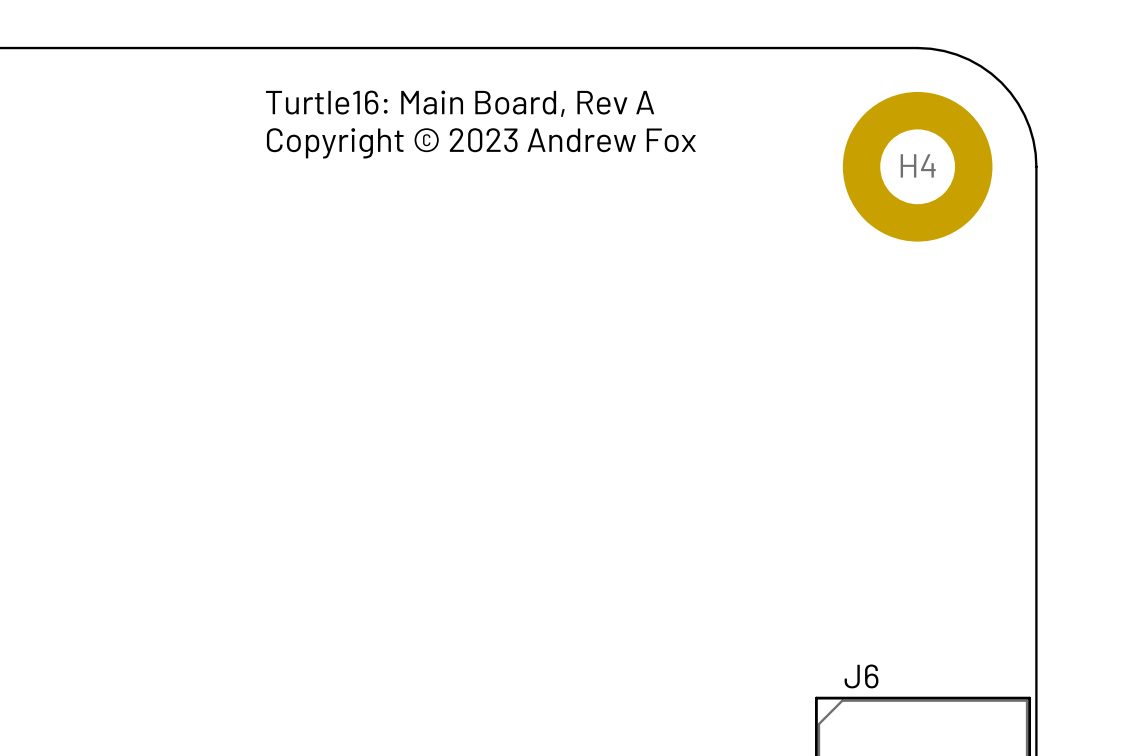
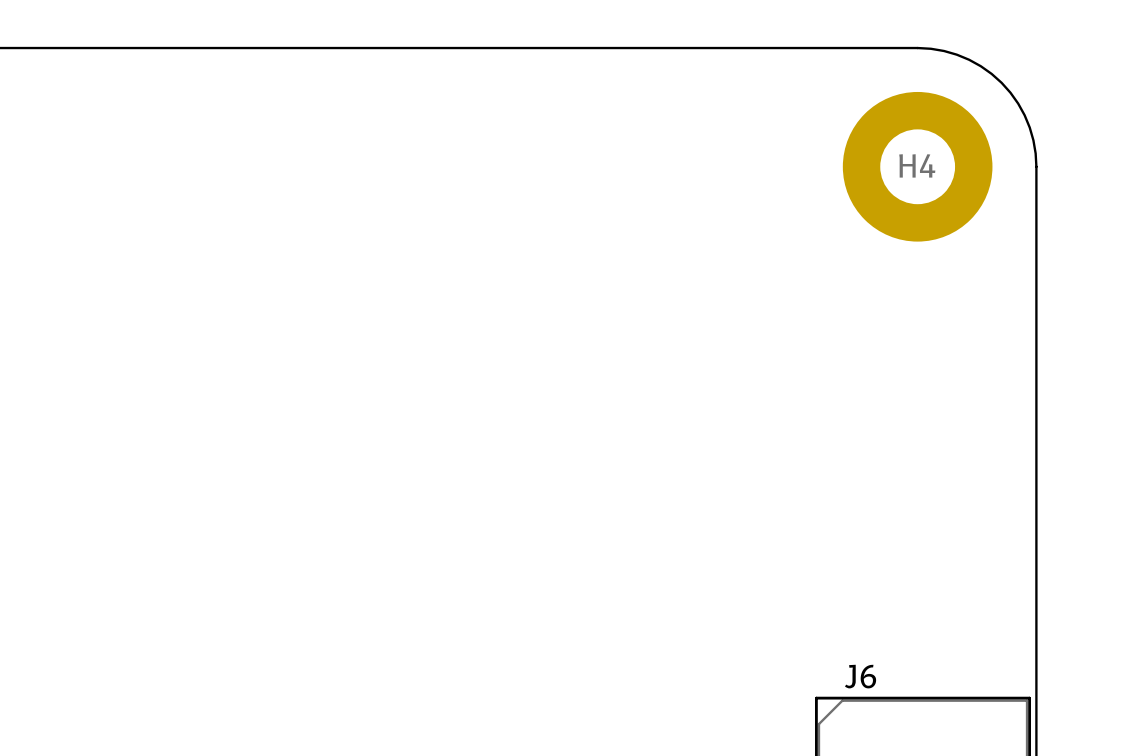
text: Turtle16: Main Board, Rev A (460, 103) -> none
text: Copyright © 2023 Andrew Fox (481, 143) -> none

